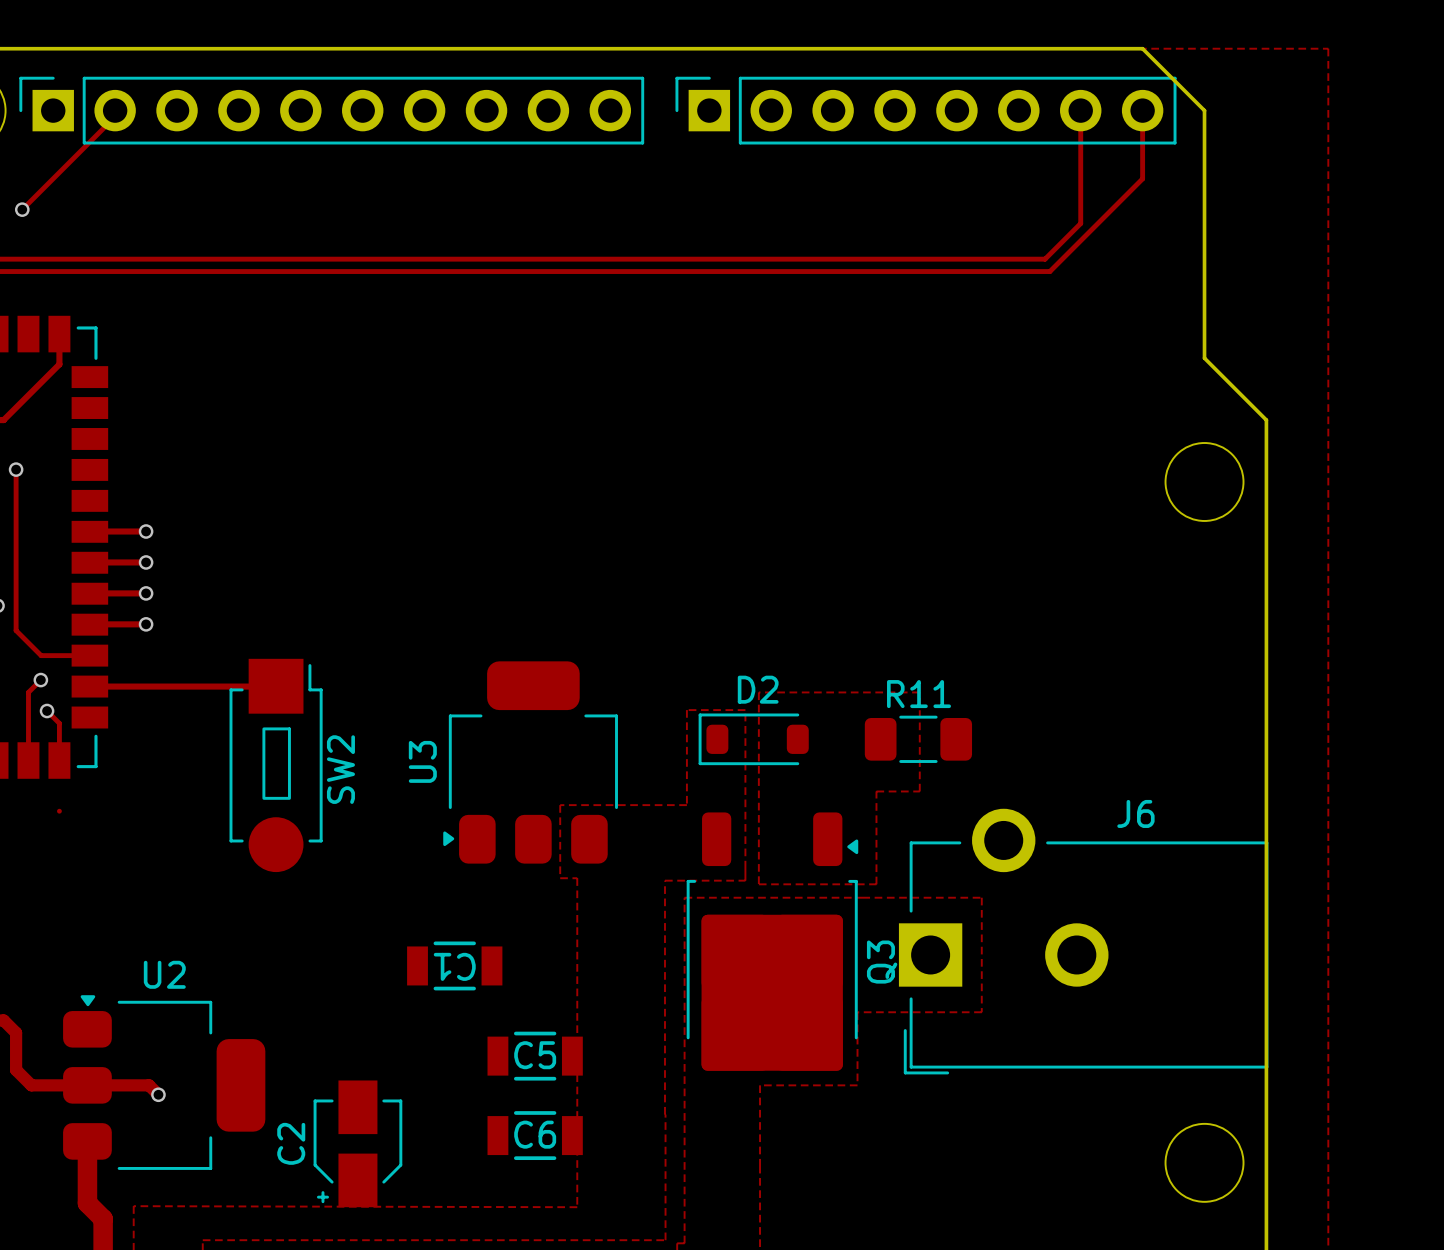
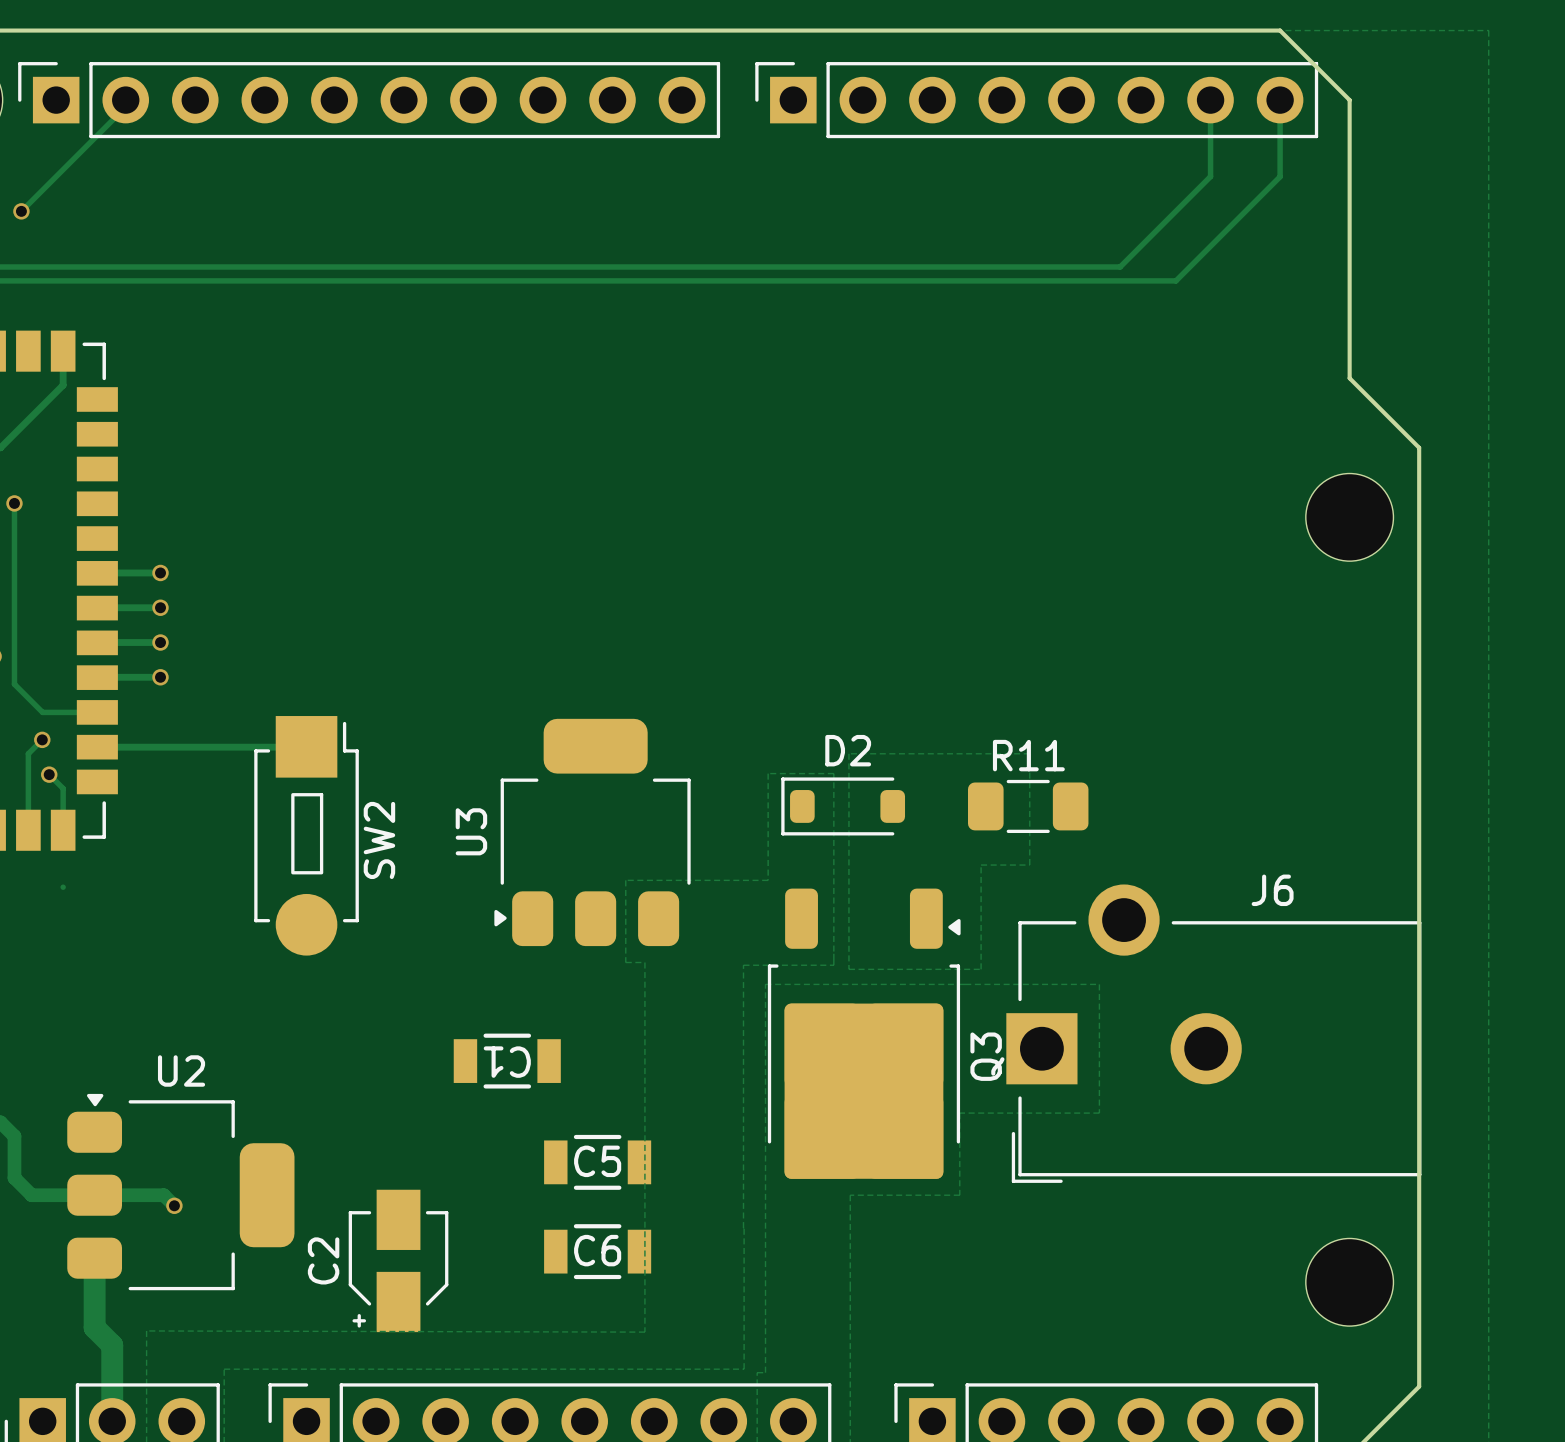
track: (1080, 178) (1080, 223) (1045, 259) (1000, 259) -> (1210, 176) (1120, 266)

